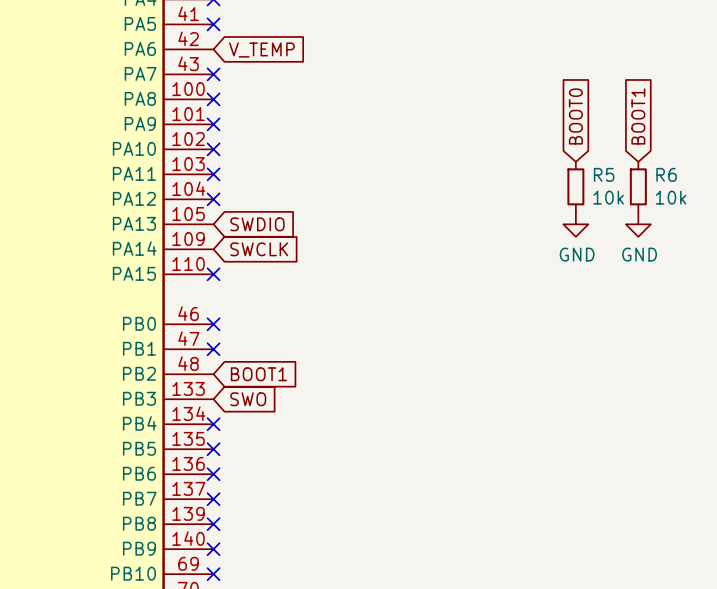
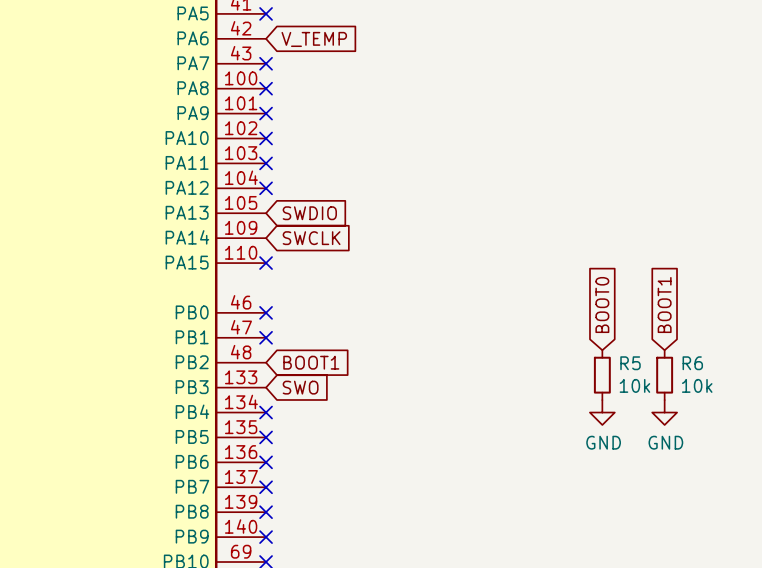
global label position: BOOT0 (575, 116) -> BOOT0 (602, 305)
global label position: BOOT1 (638, 116) -> BOOT1 (664, 305)
R5 position: (575, 186) -> (602, 375)
R6 position: (638, 186) -> (664, 375)
power symbol: GND (575, 224) -> none
power symbol: GND (638, 224) -> none
power symbol: none -> GND (602, 412)
power symbol: none -> GND (664, 412)

